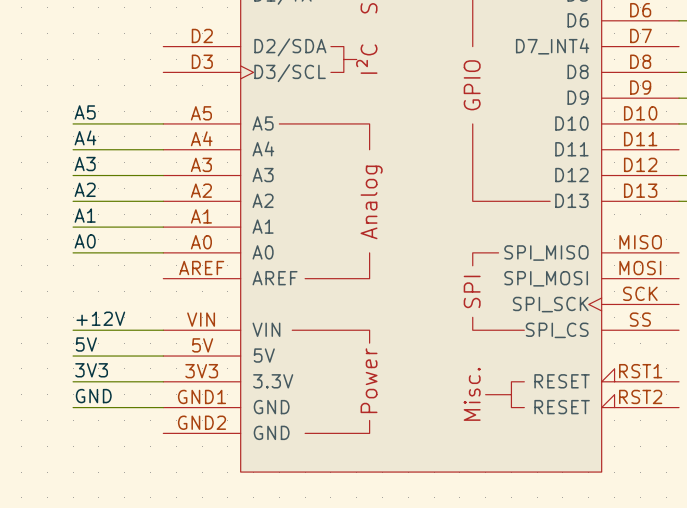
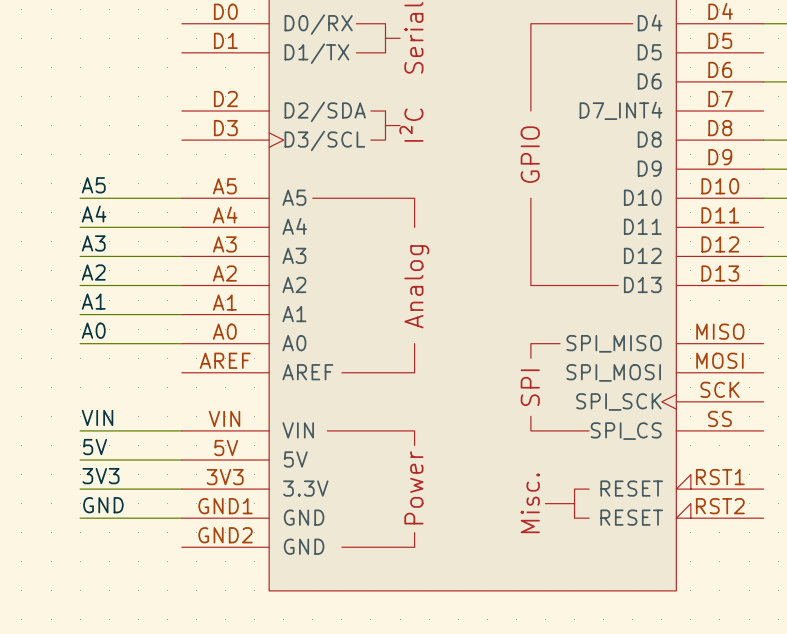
label: +12V (100, 318) -> VIN (97, 417)

